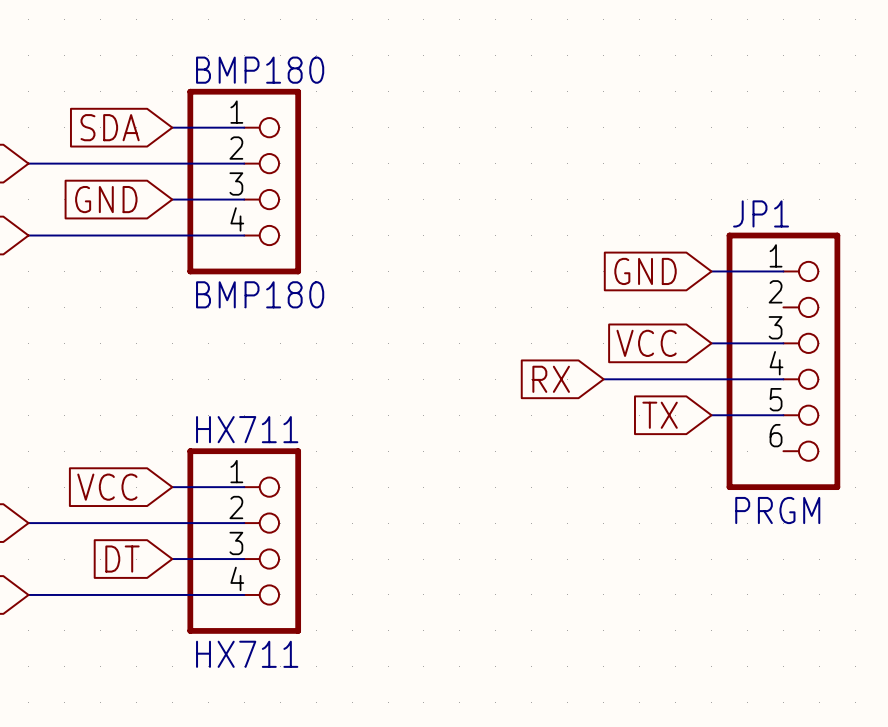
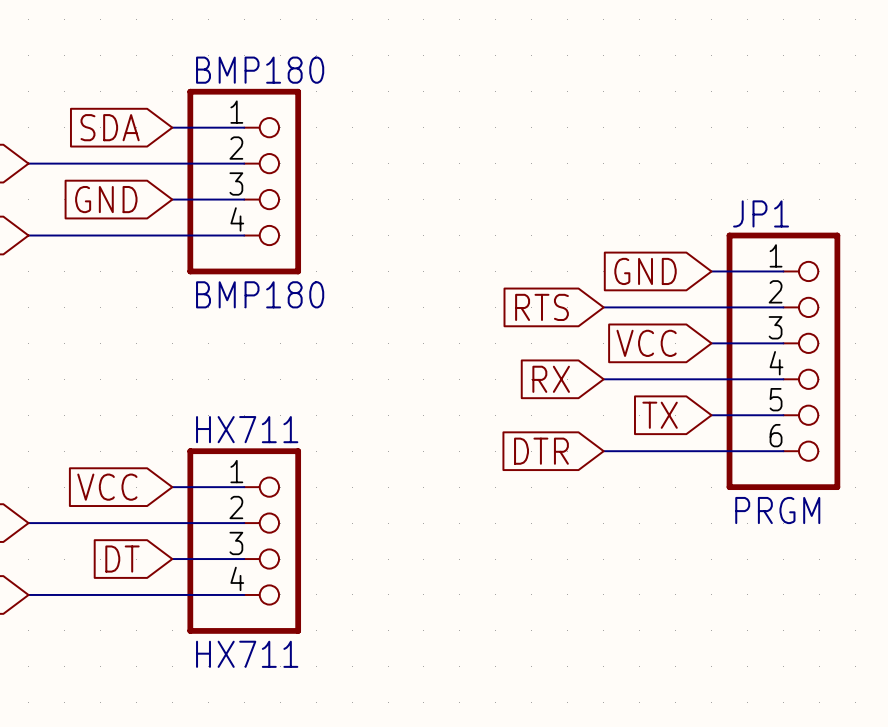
global label: none -> RTS (541, 307)
wire: none -> (603, 307) (783, 307)
global label: none -> DTR (541, 451)
wire: none -> (603, 451) (783, 451)

